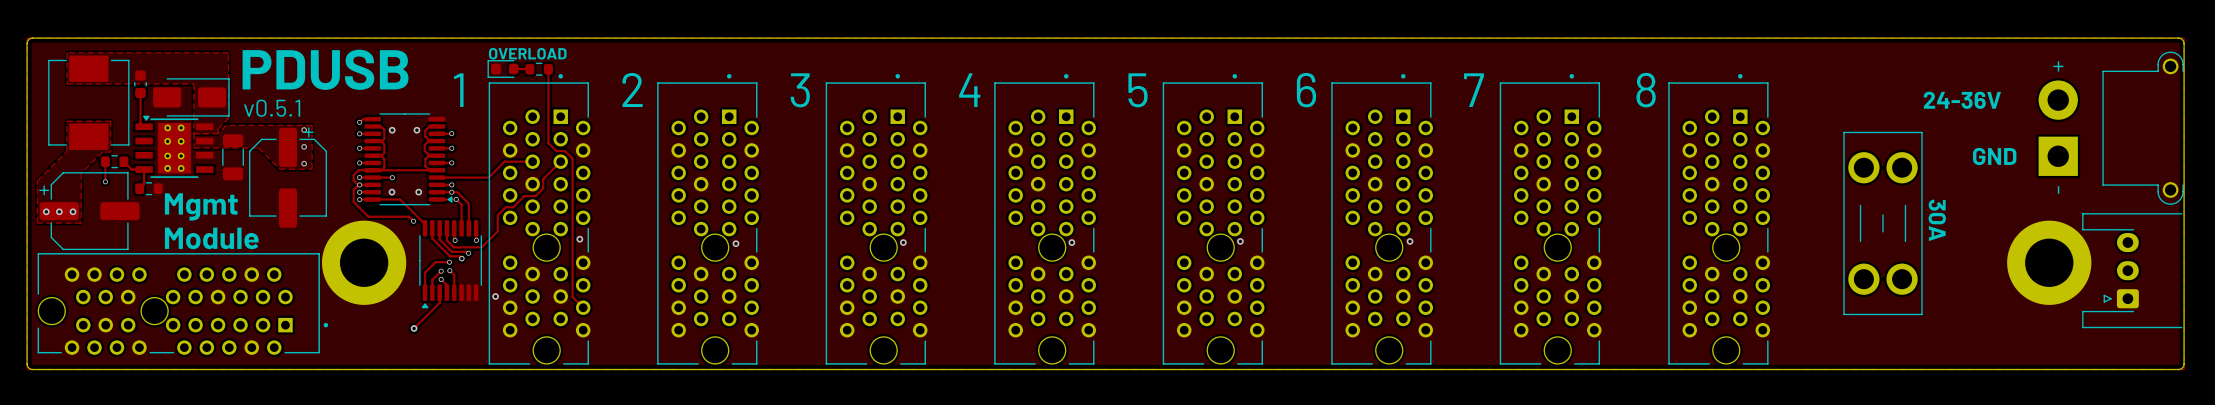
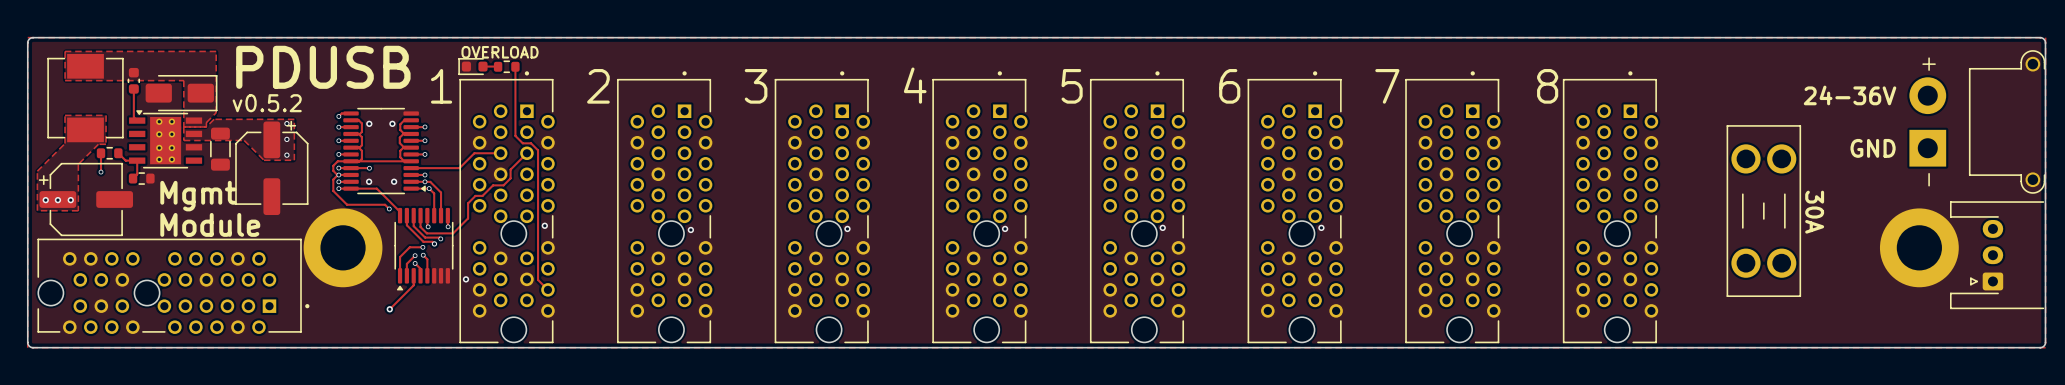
text: v0.5.1 (272, 108) -> v0.5.2 (267, 103)

